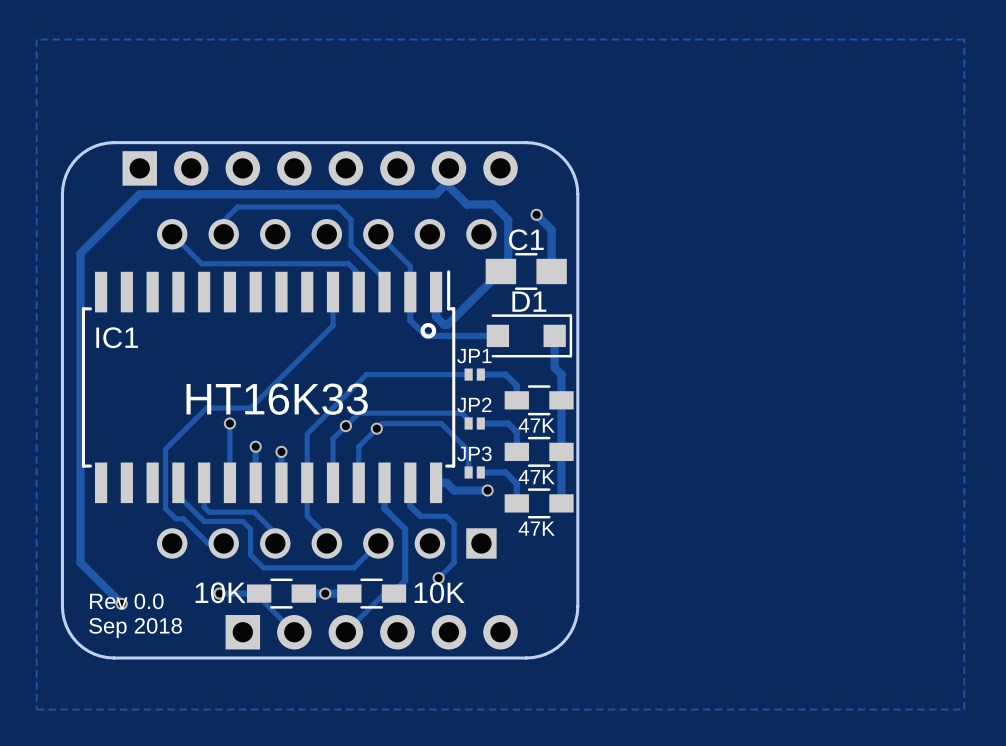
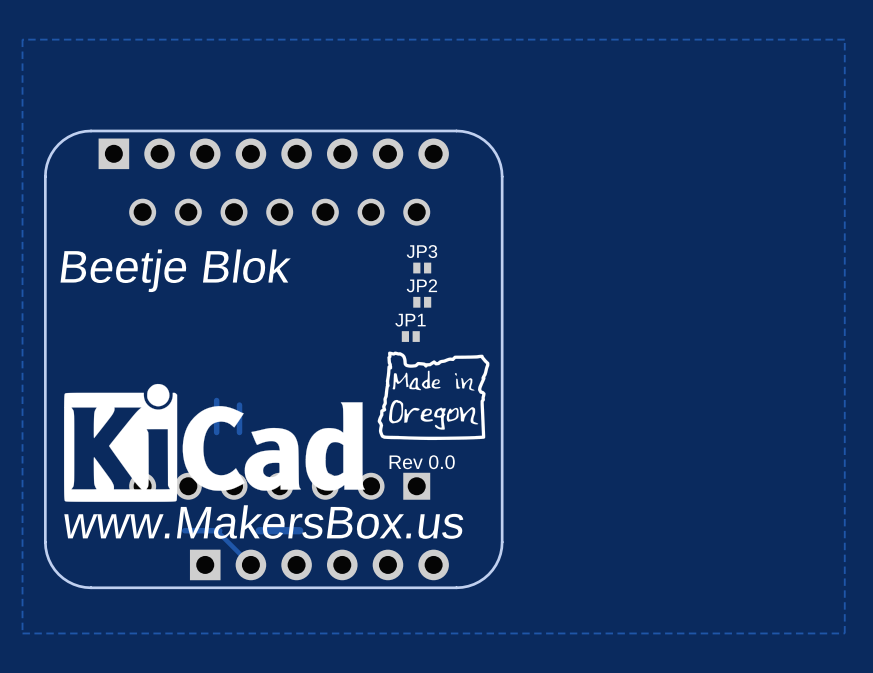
track: (448, 168) (448, 186) (467, 204) (492, 204) (508, 219) (508, 264) (447, 324) (443, 324) (436, 316) (436, 292) -> none
track: (448, 181) (436, 194) (139, 194) (80, 253) (80, 562) (121, 603) -> none
track: (536, 214) (551, 229) (551, 271) -> none
via: (536, 214) -> none
track: (172, 234) (201, 263) (348, 263) (358, 274) (358, 292) -> none
track: (223, 234) (223, 220) (237, 207) (338, 207) (351, 219) (351, 245) (384, 279) (384, 292) -> none
track: (378, 234) (410, 266) (410, 320) (425, 335) (497, 335) -> none
C1: (526, 271) -> none
track: (333, 292) (333, 325) (250, 408) (206, 408) (165, 449) (165, 508) (175, 518) (183, 518) (208, 543) (223, 543) -> none
text: none -> Beetje Blok (175, 270)
drawing: [420, 322, 437, 339] -> none
D1: (529, 335) -> none
track: (554, 335) (554, 367) (561, 374) (561, 503) -> none
track: (468, 374) (366, 374) (307, 433) (307, 516) (326, 535) (326, 543) -> none
track: (480, 374) (505, 374) (516, 385) (516, 400) -> none
IC1: (268, 386) -> none
drawing: none -> [63, 351, 490, 502]
text: HT16K33 (277, 399) -> none
part: 47K (539, 400) -> none
track: (229, 423) (229, 482) -> none
via: (229, 423) -> none
track: (468, 423) (468, 420) (461, 413) (358, 413) (333, 438) (333, 482) -> none
JP2 position: (474, 423) -> (422, 302)
track: (480, 423) (508, 423) (516, 432) (516, 451) -> none
via: (345, 426) -> none
via: (376, 428) -> none
via: (255, 446) -> none
via: (281, 451) -> none
part: 47K (539, 451) -> none
track: (468, 472) (468, 450) (441, 423) (381, 423) (358, 446) (358, 482) -> none
JP3 position: (474, 472) -> (422, 268)
track: (480, 472) (505, 472) (516, 483) (516, 503) -> none
track: (178, 482) (178, 495) (204, 521) (242, 521) (250, 529) (250, 554) (263, 567) (354, 567) (378, 543) -> none
track: (204, 482) (204, 507) (209, 512) (254, 512) (275, 533) (275, 543) -> none
track: (384, 482) (384, 508) (405, 529) (405, 580) (393, 593) (384, 593) (345, 632) -> none
track: (410, 482) (410, 505) (420, 516) (446, 516) (454, 524) (454, 562) (438, 578) -> none
track: (436, 482) (446, 482) (454, 490) (487, 490) -> none
via: (487, 490) -> none
part: 47K (539, 503) -> none
via: (438, 578) -> none
text: none -> www.MakersBox.us (263, 522)
via: (219, 593) -> none
part: 10K (281, 593) -> none
via: (325, 593) -> none
part: 10K (371, 593) -> none
text position: Rev 0.0 (126, 601) -> Rev 0.0 (422, 462)
via: (121, 603) -> none
text: Sep 2018 (135, 628) -> none

